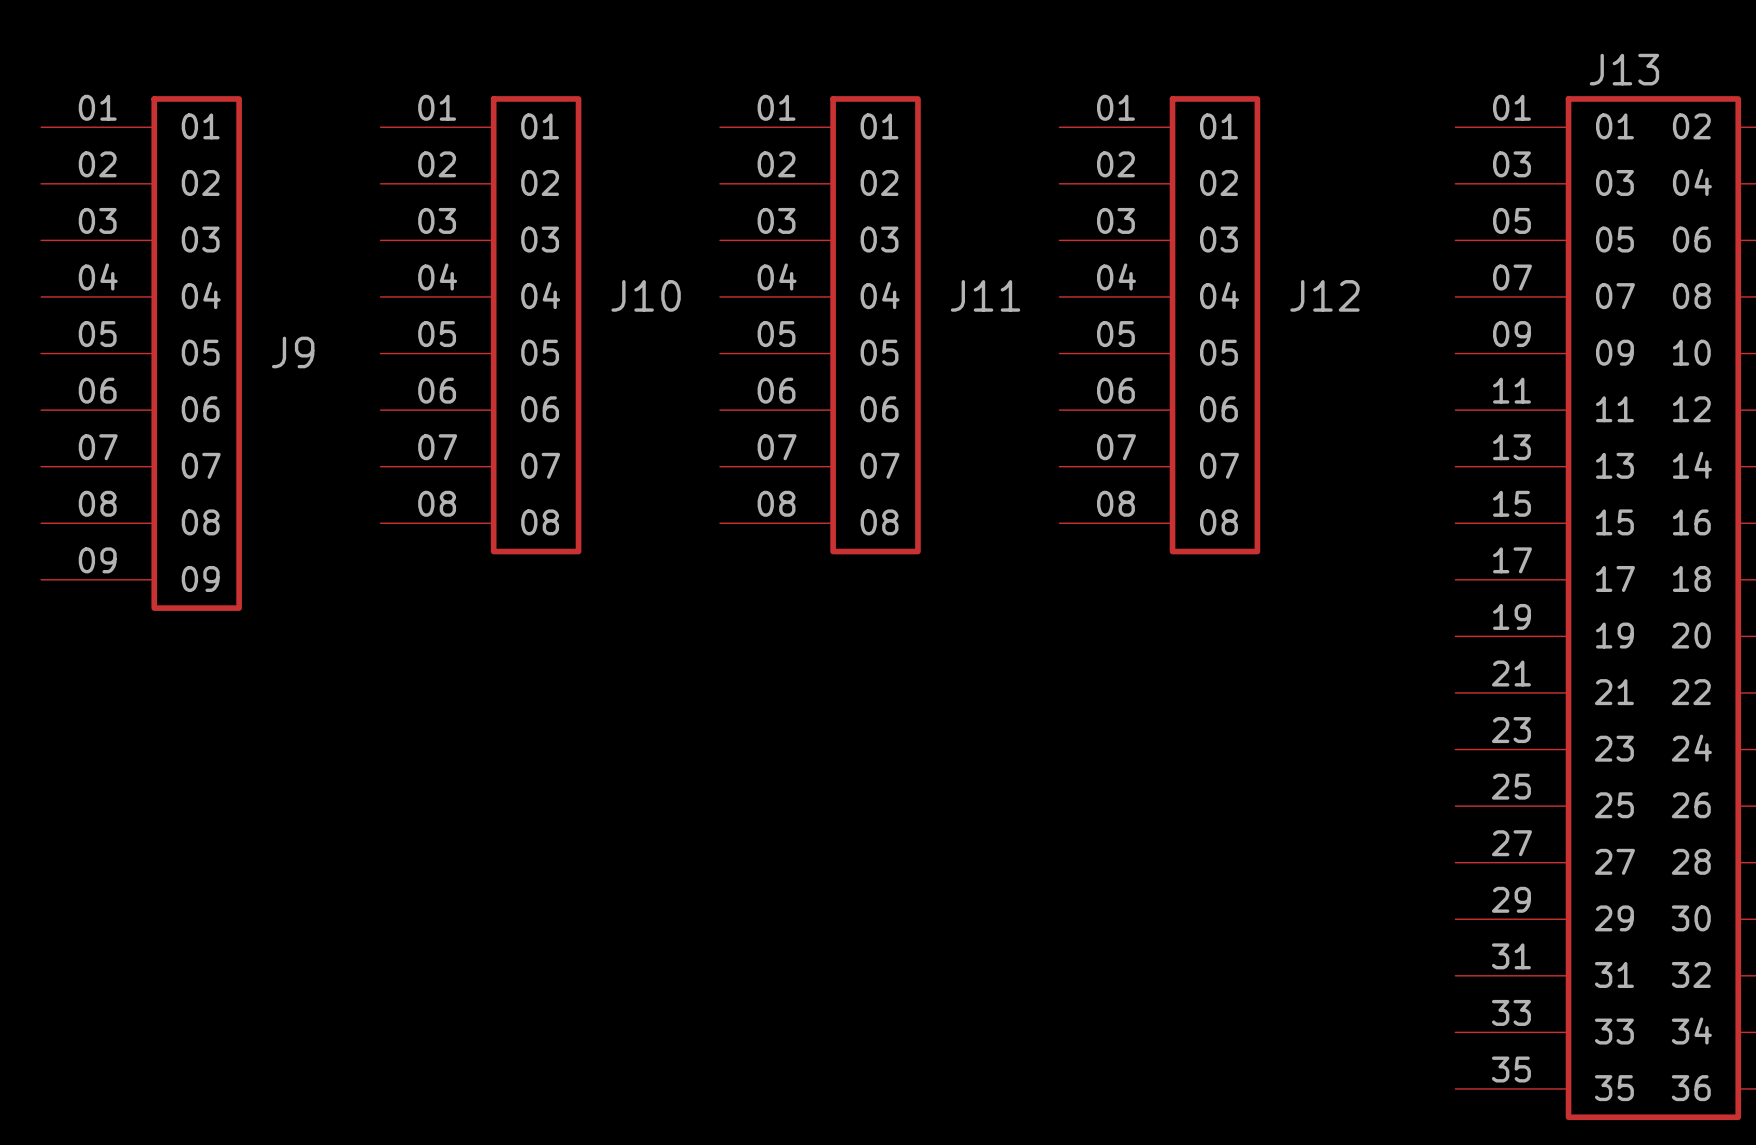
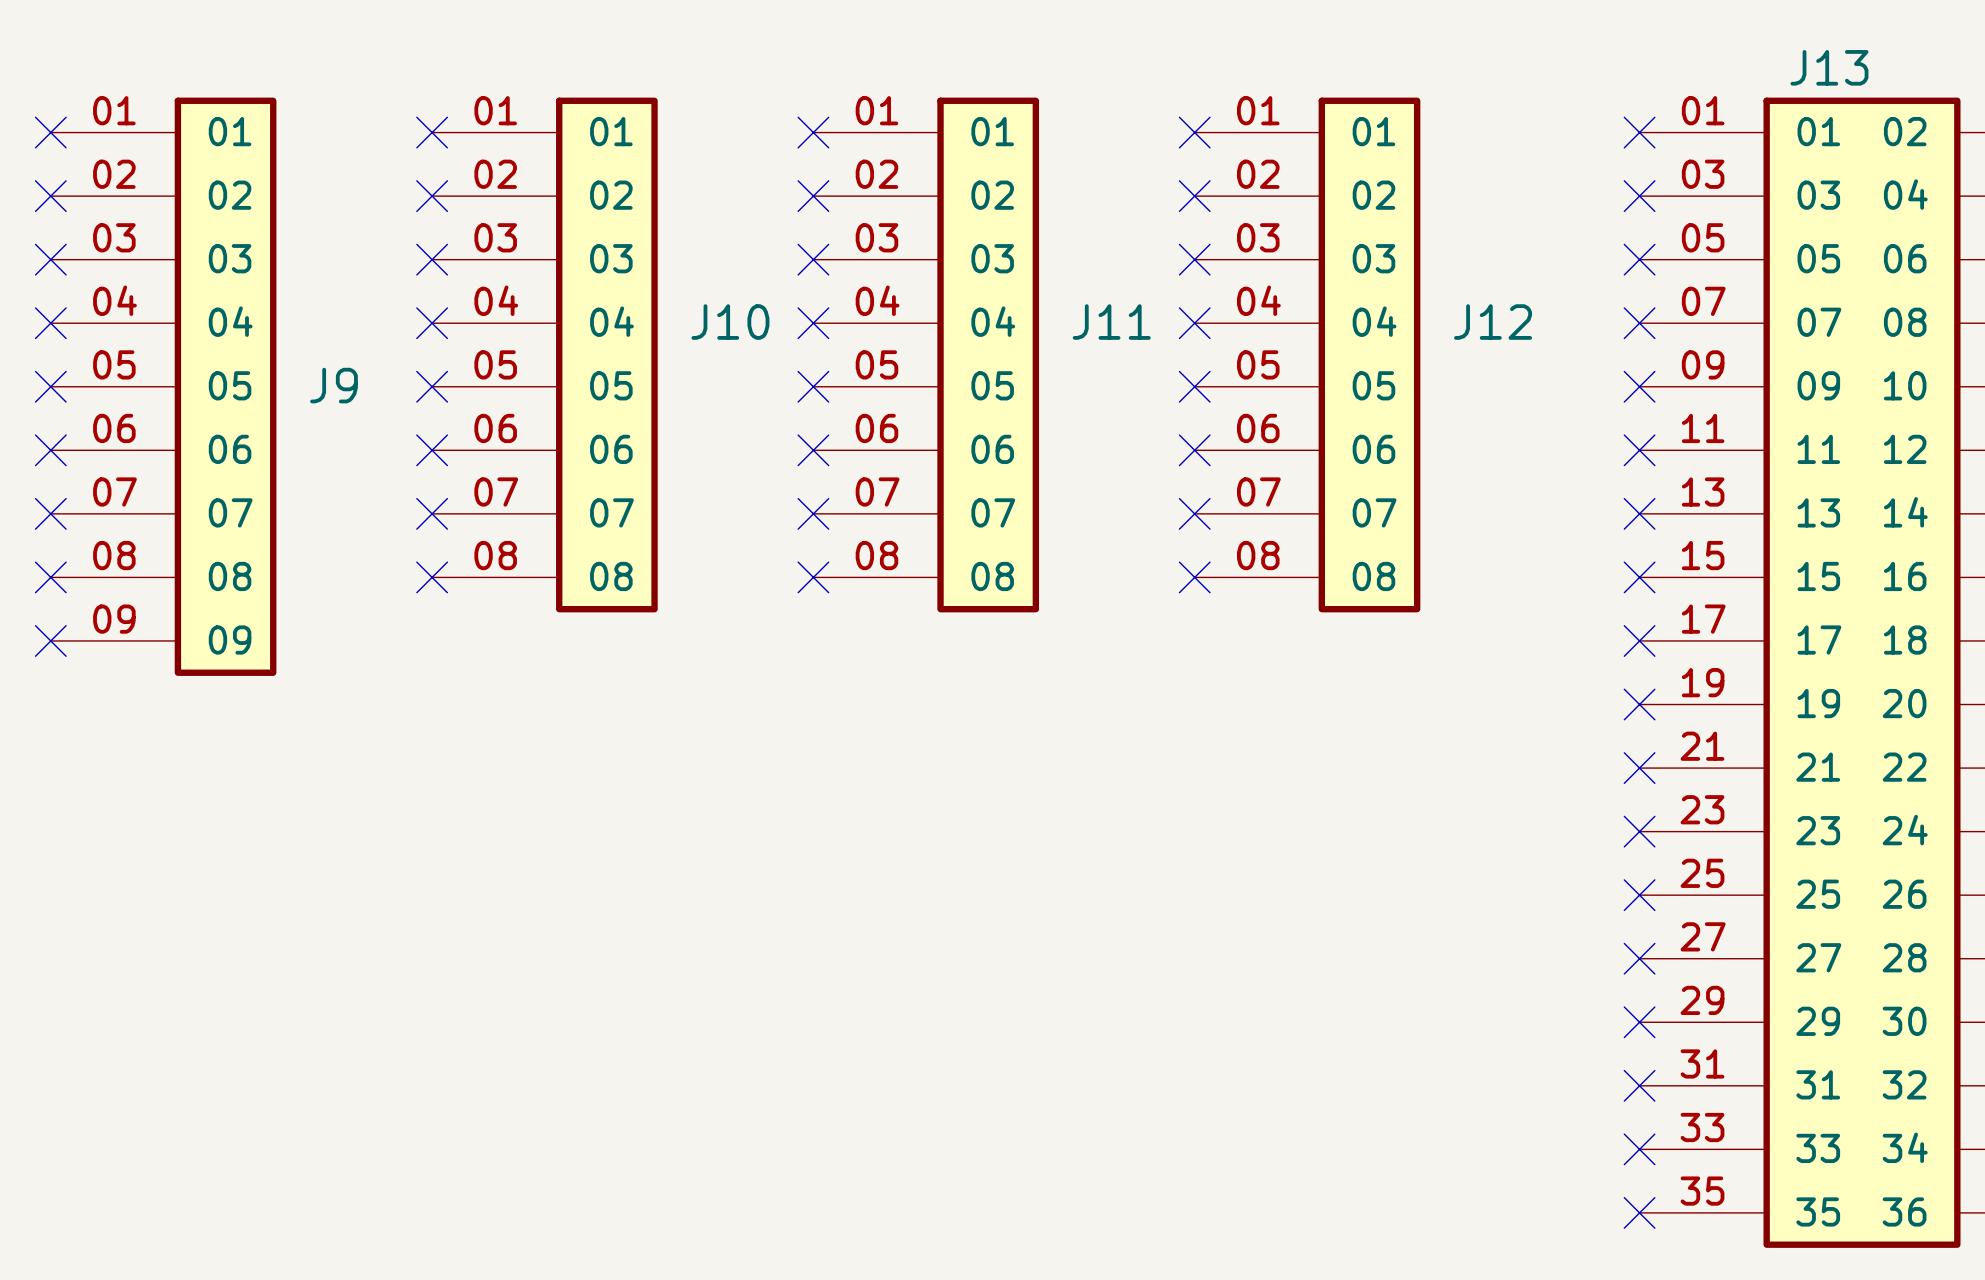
no-connect mark: none -> (50, 132)
no-connect mark: none -> (432, 132)
no-connect mark: none -> (813, 132)
no-connect mark: none -> (1194, 132)
no-connect mark: none -> (1639, 132)
no-connect mark: none -> (50, 196)
no-connect mark: none -> (432, 196)
no-connect mark: none -> (813, 196)
no-connect mark: none -> (1194, 196)
no-connect mark: none -> (1639, 196)
no-connect mark: none -> (50, 259)
no-connect mark: none -> (432, 259)
no-connect mark: none -> (813, 259)
no-connect mark: none -> (1194, 259)
no-connect mark: none -> (1639, 259)
no-connect mark: none -> (50, 323)
no-connect mark: none -> (432, 323)
no-connect mark: none -> (813, 323)
no-connect mark: none -> (1194, 323)
no-connect mark: none -> (1639, 323)
no-connect mark: none -> (50, 386)
no-connect mark: none -> (432, 386)
no-connect mark: none -> (813, 386)
no-connect mark: none -> (1194, 386)
no-connect mark: none -> (1639, 386)
no-connect mark: none -> (50, 450)
no-connect mark: none -> (432, 450)
no-connect mark: none -> (813, 450)
no-connect mark: none -> (1194, 450)
no-connect mark: none -> (1639, 450)
no-connect mark: none -> (50, 513)
no-connect mark: none -> (432, 513)
no-connect mark: none -> (813, 513)
no-connect mark: none -> (1194, 513)
no-connect mark: none -> (1639, 513)
no-connect mark: none -> (50, 577)
no-connect mark: none -> (432, 577)
no-connect mark: none -> (813, 577)
no-connect mark: none -> (1194, 577)
no-connect mark: none -> (1639, 577)
no-connect mark: none -> (50, 640)
no-connect mark: none -> (1639, 640)
no-connect mark: none -> (1639, 704)
no-connect mark: none -> (1639, 768)
no-connect mark: none -> (1639, 831)
no-connect mark: none -> (1639, 895)
no-connect mark: none -> (1639, 958)
no-connect mark: none -> (1639, 1022)
no-connect mark: none -> (1639, 1085)
no-connect mark: none -> (1639, 1149)
no-connect mark: none -> (1639, 1212)

